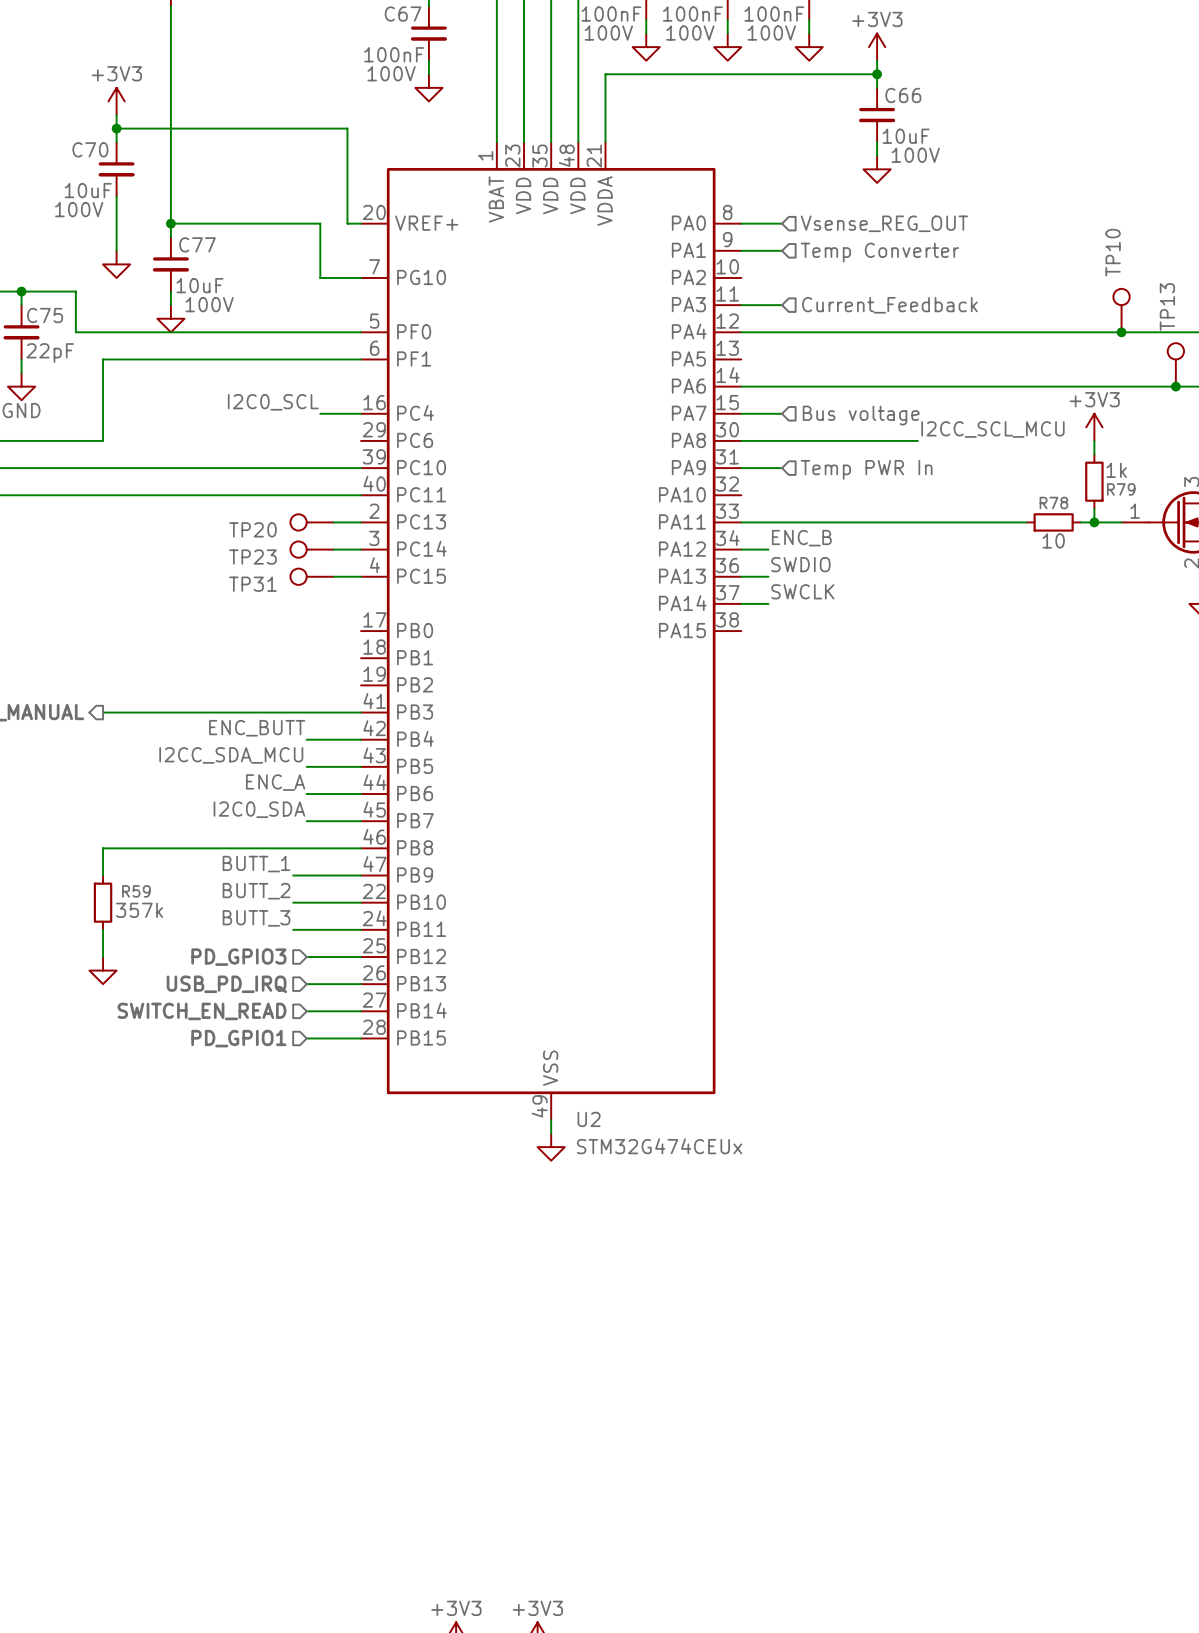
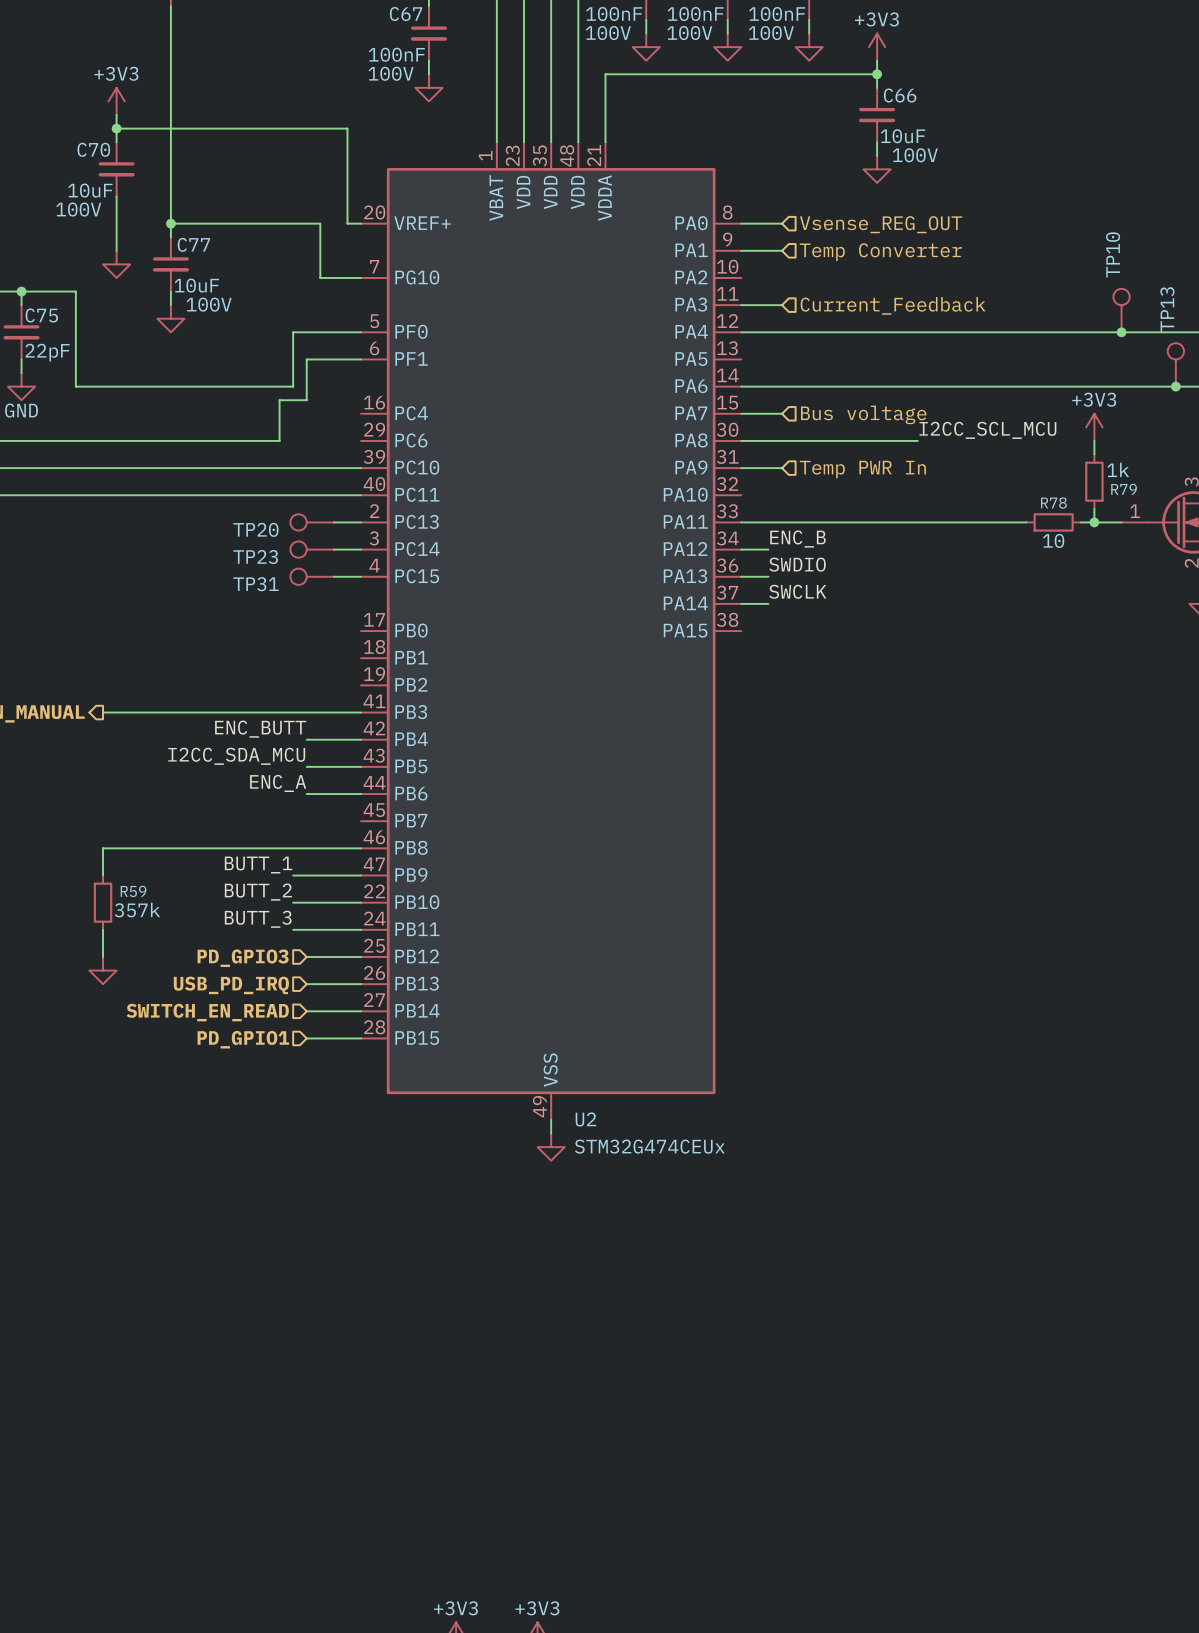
wire: (75, 332) (293, 332) -> (75, 332) (75, 386) (293, 386) (293, 332)
wire: (306, 359) (103, 359) (103, 440) -> (306, 359) (306, 400) (279, 400) (279, 440) (103, 440)
label: I2C0_SCL (273, 402) -> none
wire: (320, 413) (361, 413) -> none
label: I2C0_SDA (259, 809) -> none
wire: (306, 821) (361, 821) -> none

